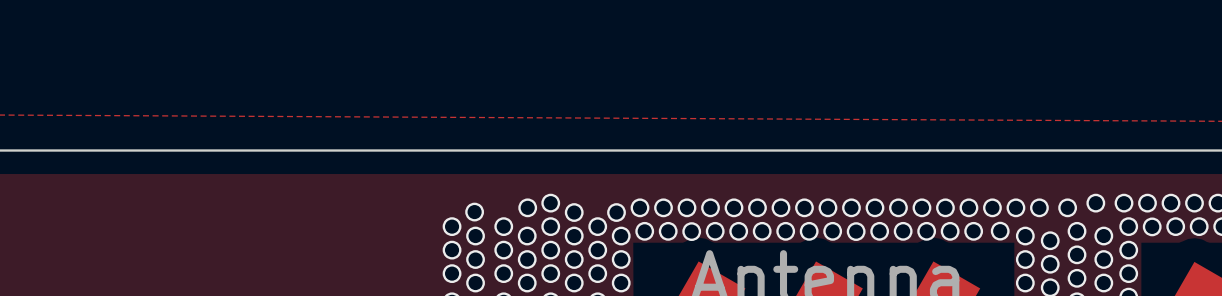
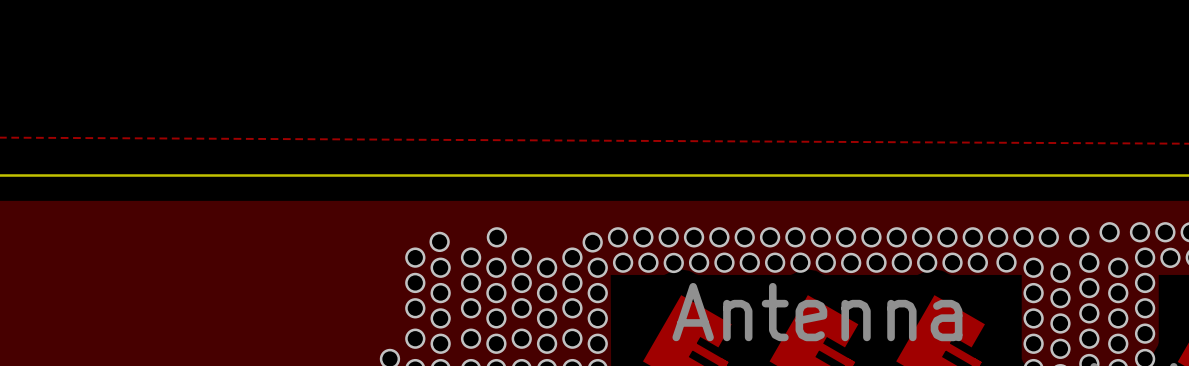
via: (550, 203) -> none
via: (574, 212) -> none

